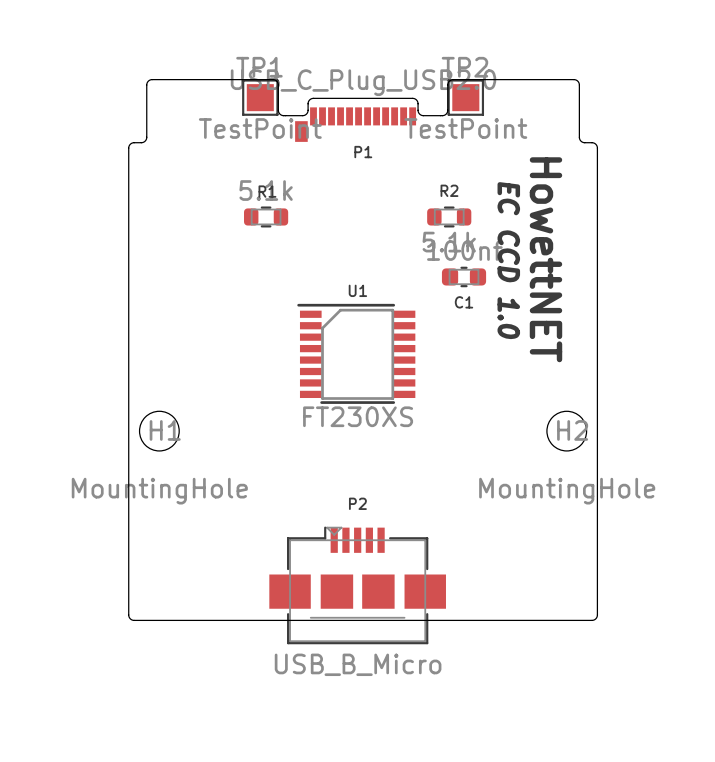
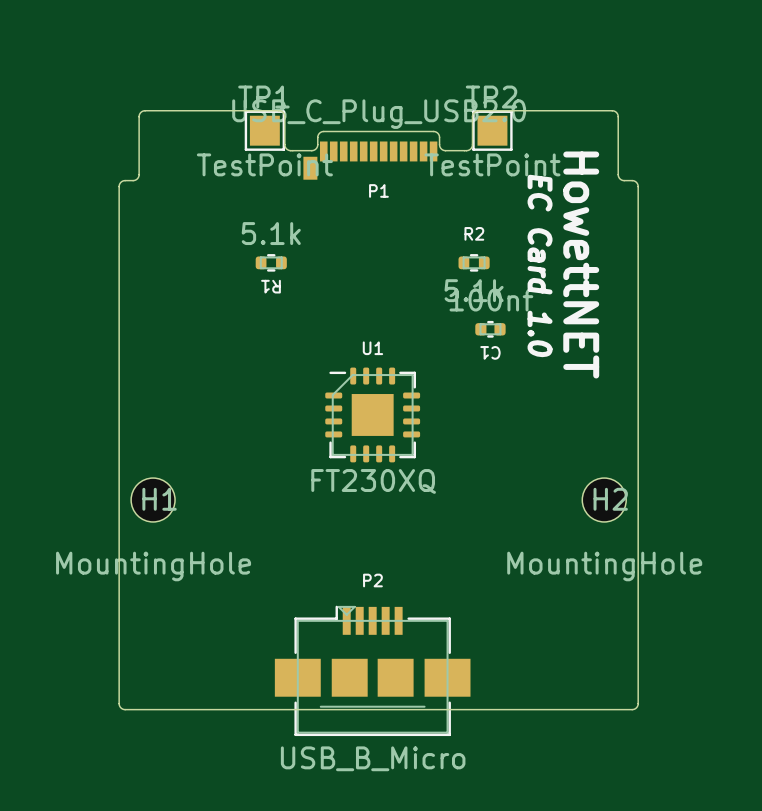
R1 name rotation: 0° (267, 191) -> 180° (270, 286)
R1 name position: R1 (267, 191) -> R1 (270, 286)
R1 footprint: [244, 206, 289, 228] -> [255, 254, 287, 272]
R2 footprint: [427, 206, 472, 228] -> [458, 254, 490, 272]
text position: HowettNET (545, 259) -> HowettNET (581, 264)
text: EC CCD 1.0 (508, 260) -> EC Card 1.0 (540, 265)
C1 footprint: [441, 266, 487, 288] -> [475, 320, 506, 338]
C1 name rotation: 0° (464, 302) -> 180° (490, 352)
U1 footprint: [297, 303, 416, 404] -> [325, 367, 421, 463]
U1 value: FT230XS (358, 416) -> FT230XQ (373, 481)

